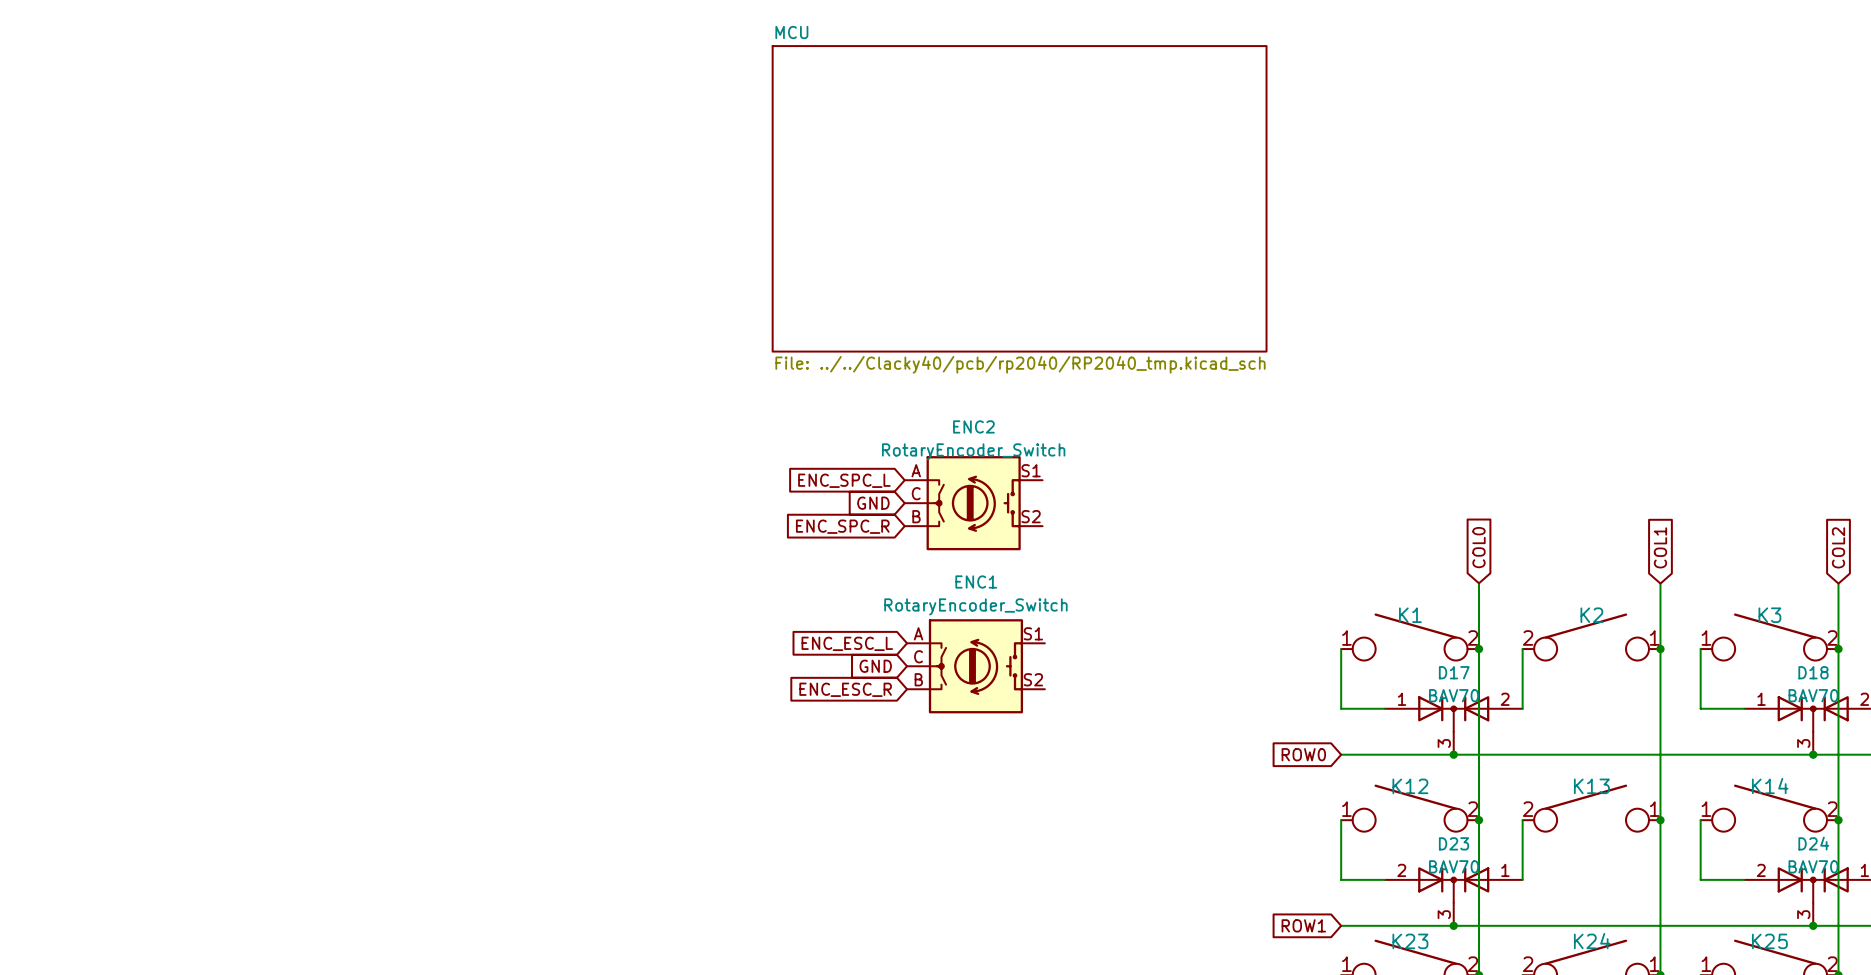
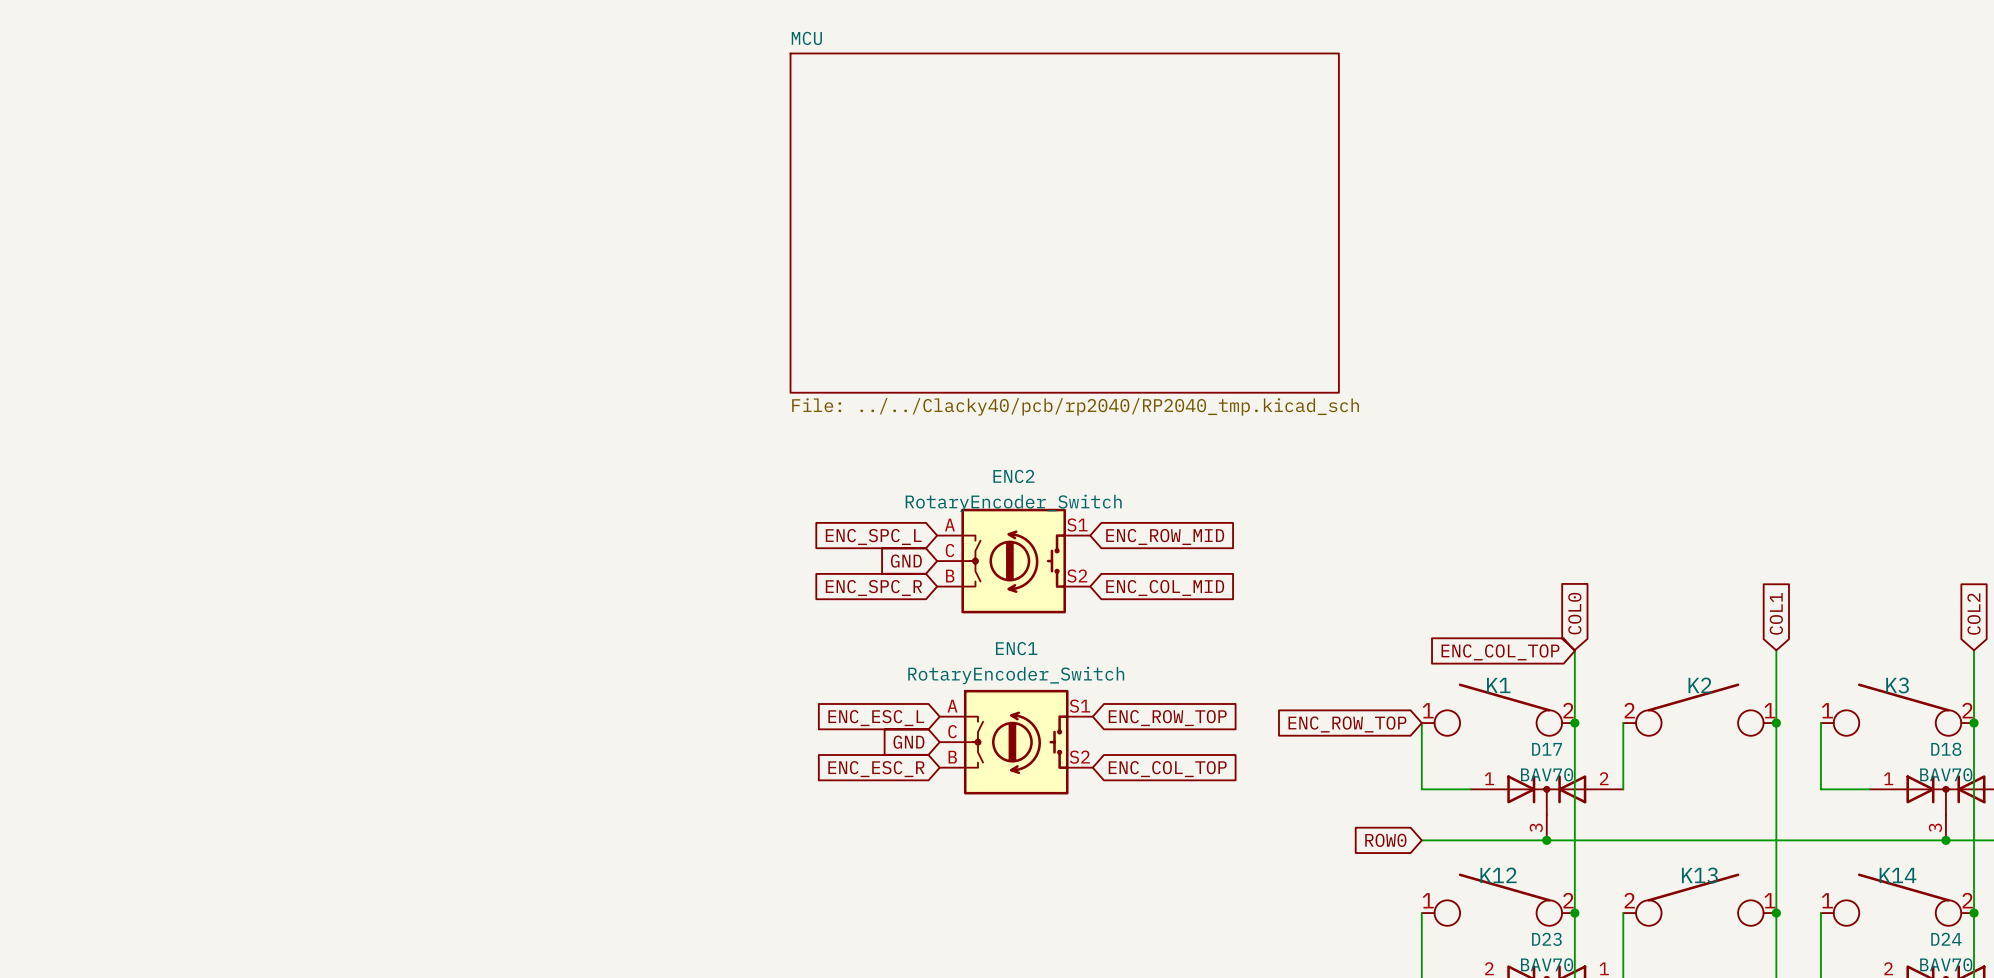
global label: none -> ENC_ROW_MID (1165, 536)
global label: none -> ENC_COL_MID (1165, 588)
global label: none -> ENC_COL_TOP (1500, 652)
global label: none -> ENC_ROW_TOP (1167, 718)
global label: none -> ENC_ROW_TOP (1347, 724)
global label: none -> ENC_COL_TOP (1167, 769)

